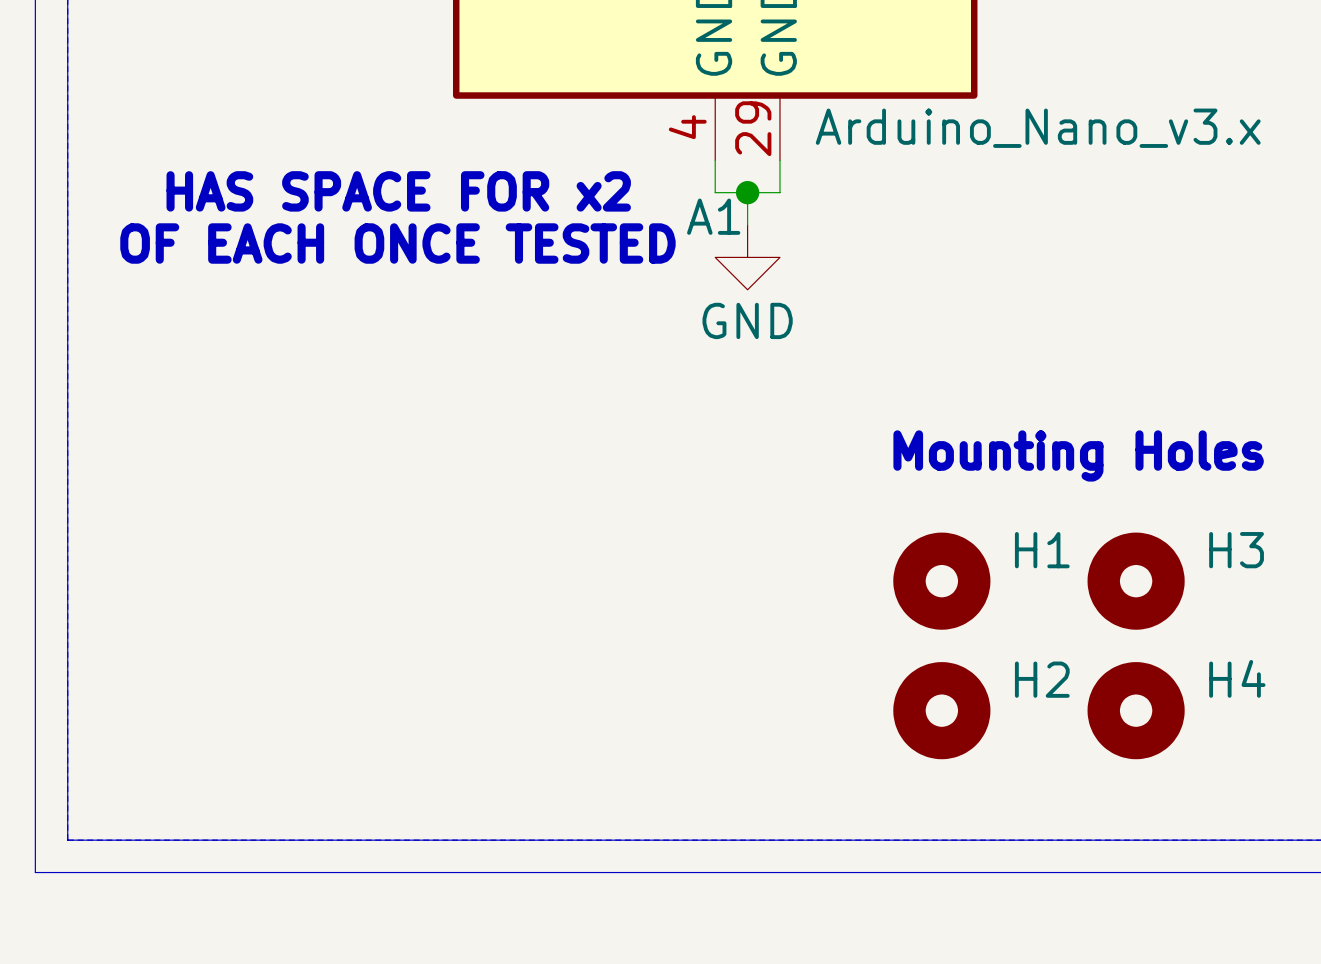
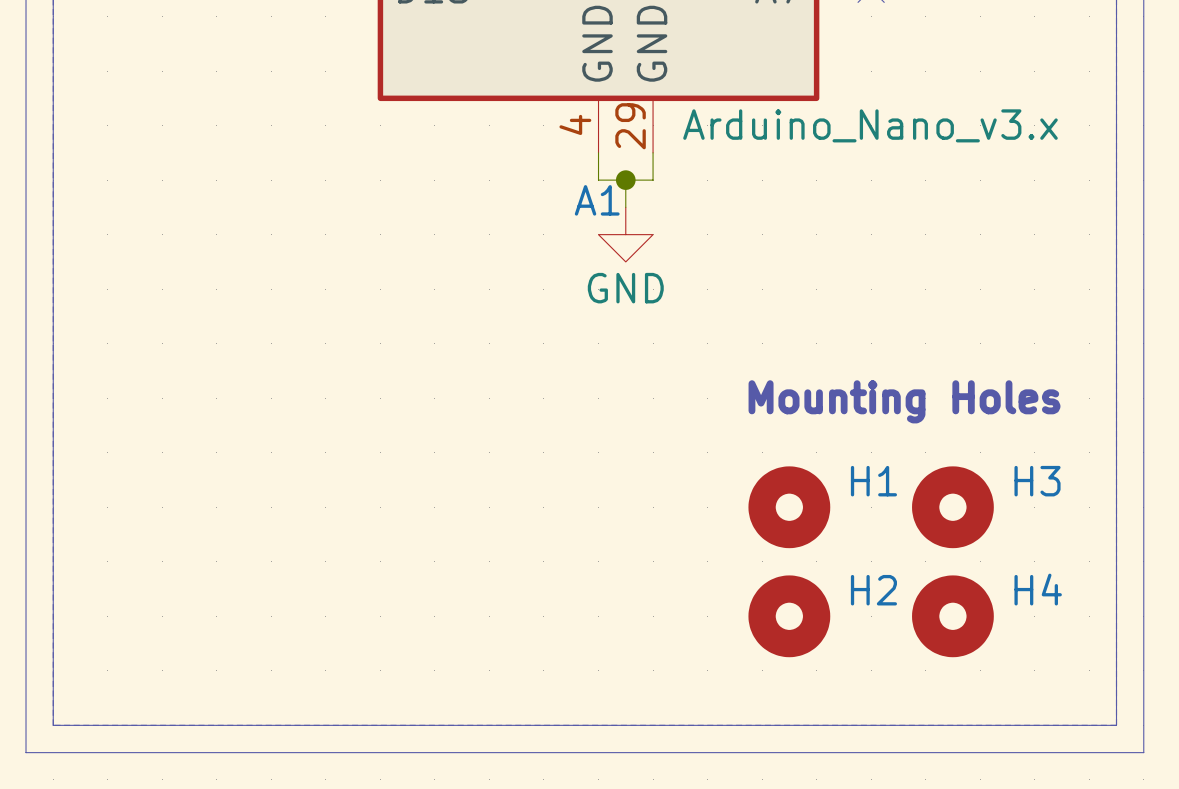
text: HAS SPACE FOR x2 (398, 191) -> none
text: OF EACH ONCE TESTED (397, 243) -> none

